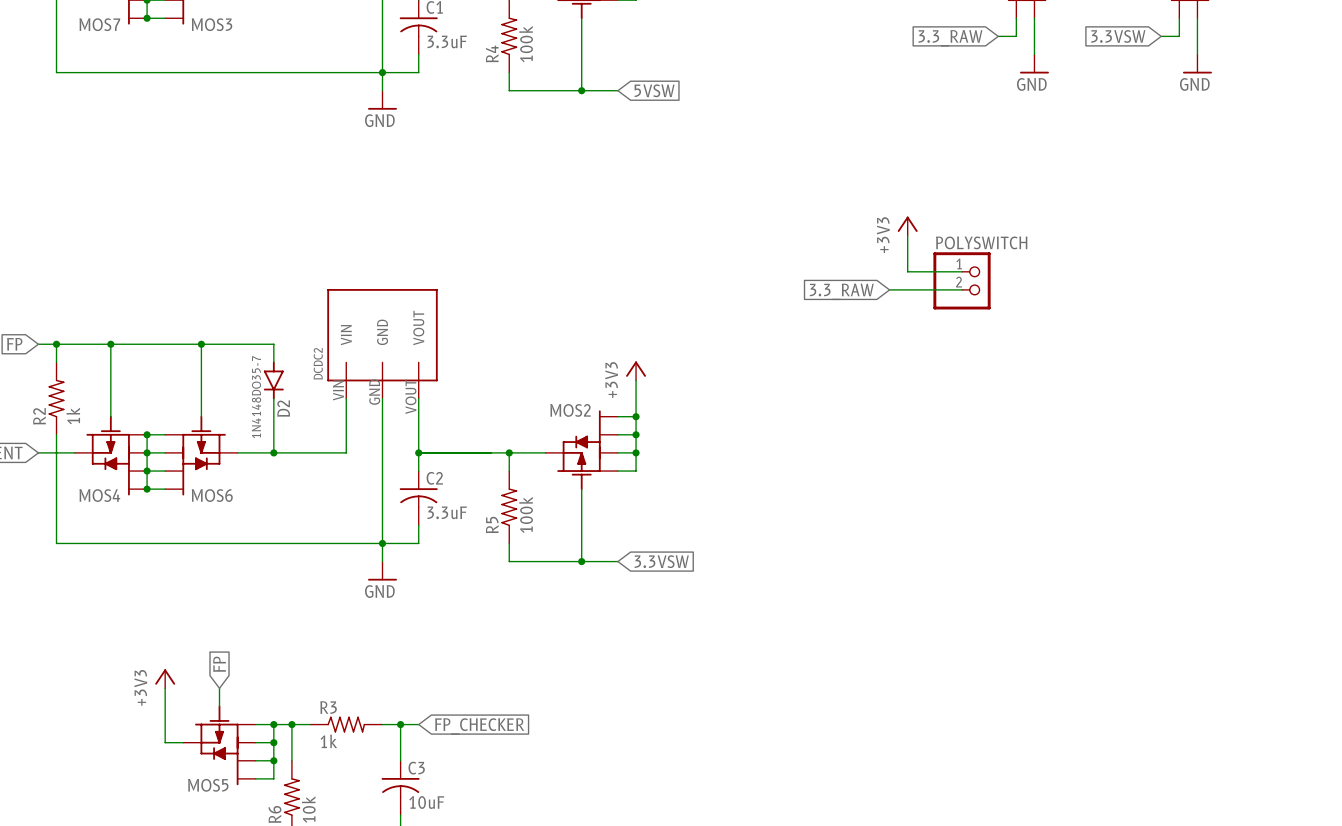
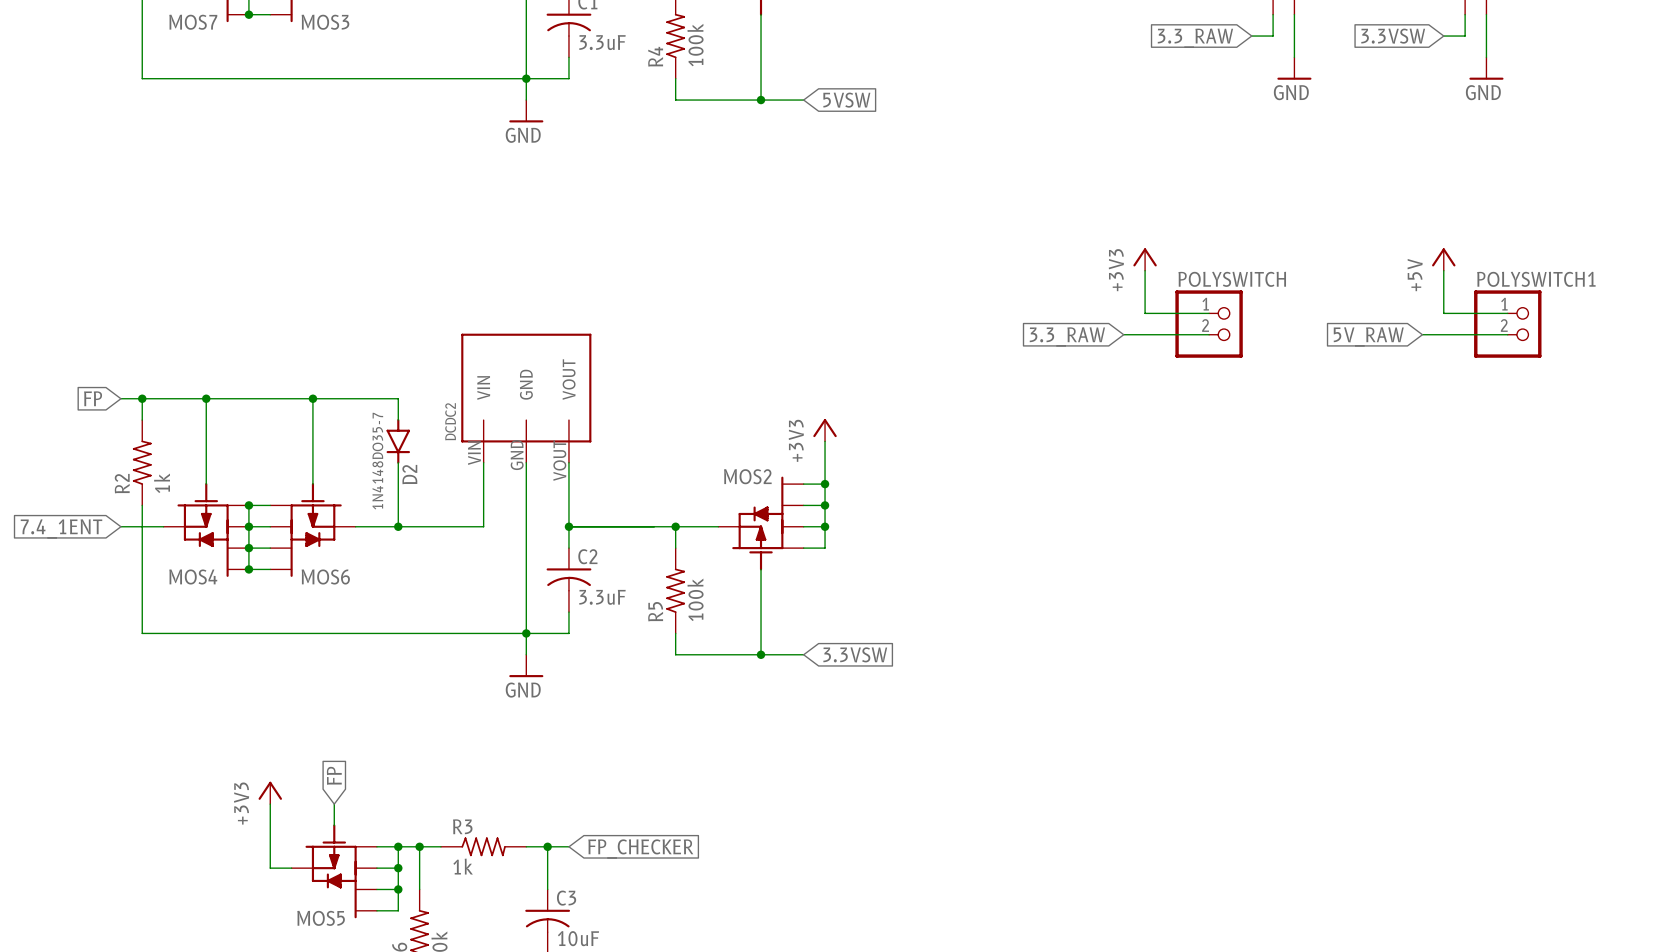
power symbol: none -> +5V (1443, 259)
wire: none -> (1443, 270) (1443, 313) (1507, 313)
POLYSWITCH1: none -> (1507, 324)
wire: none -> (1422, 334) (1507, 334)
global label: none -> 5V_RAW (1368, 336)

